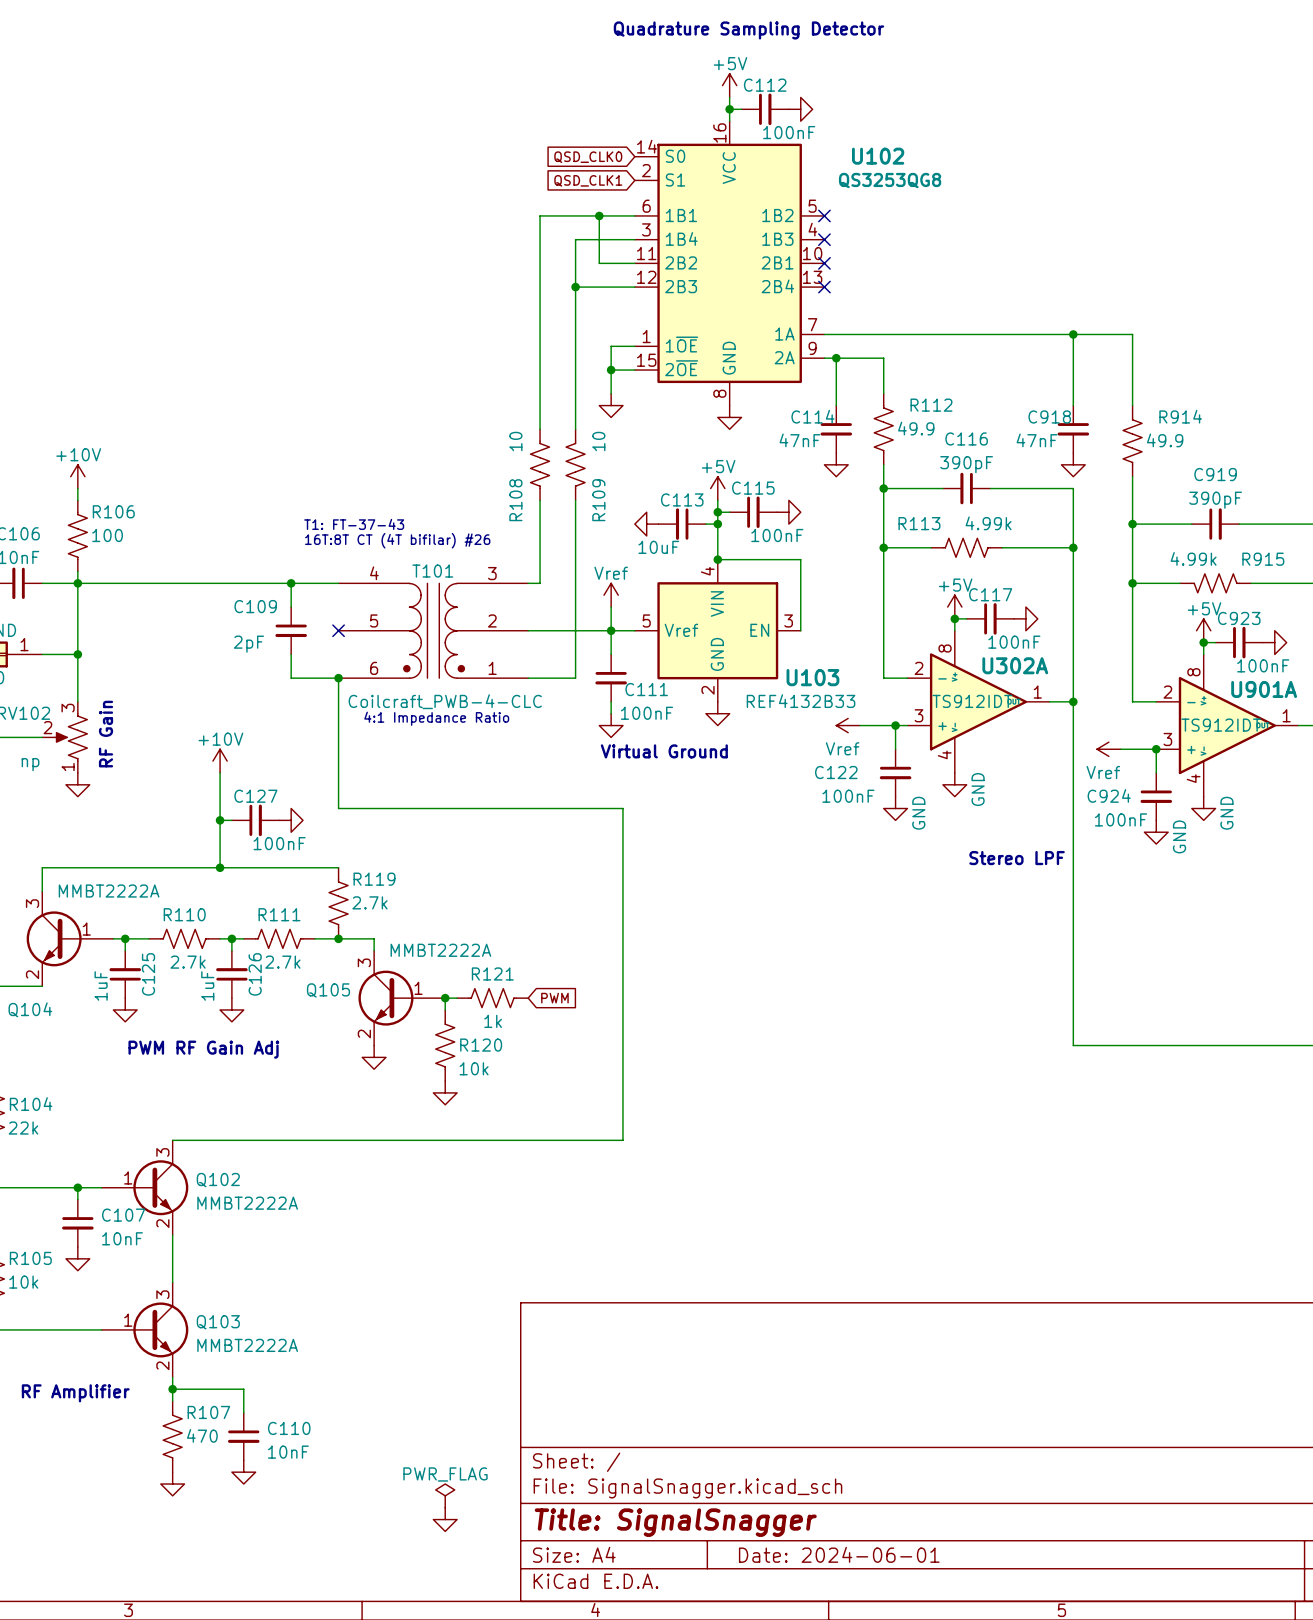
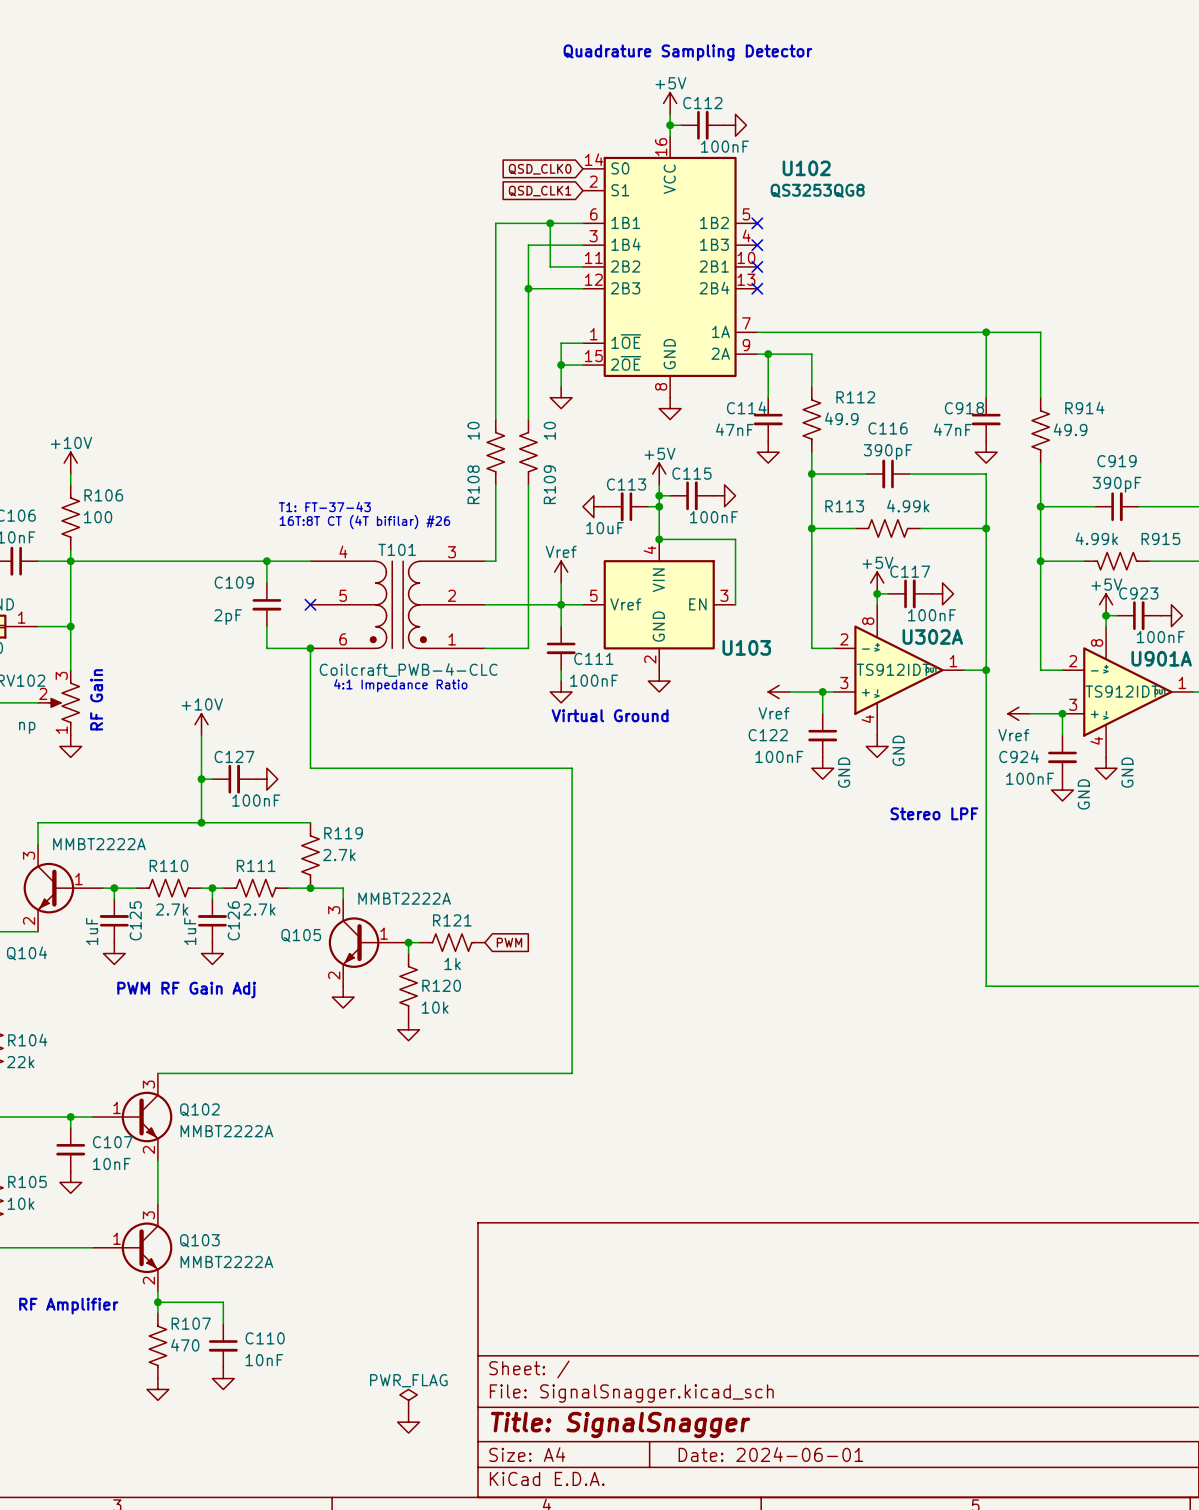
U103 value: REF4132B33 (801, 701) -> none

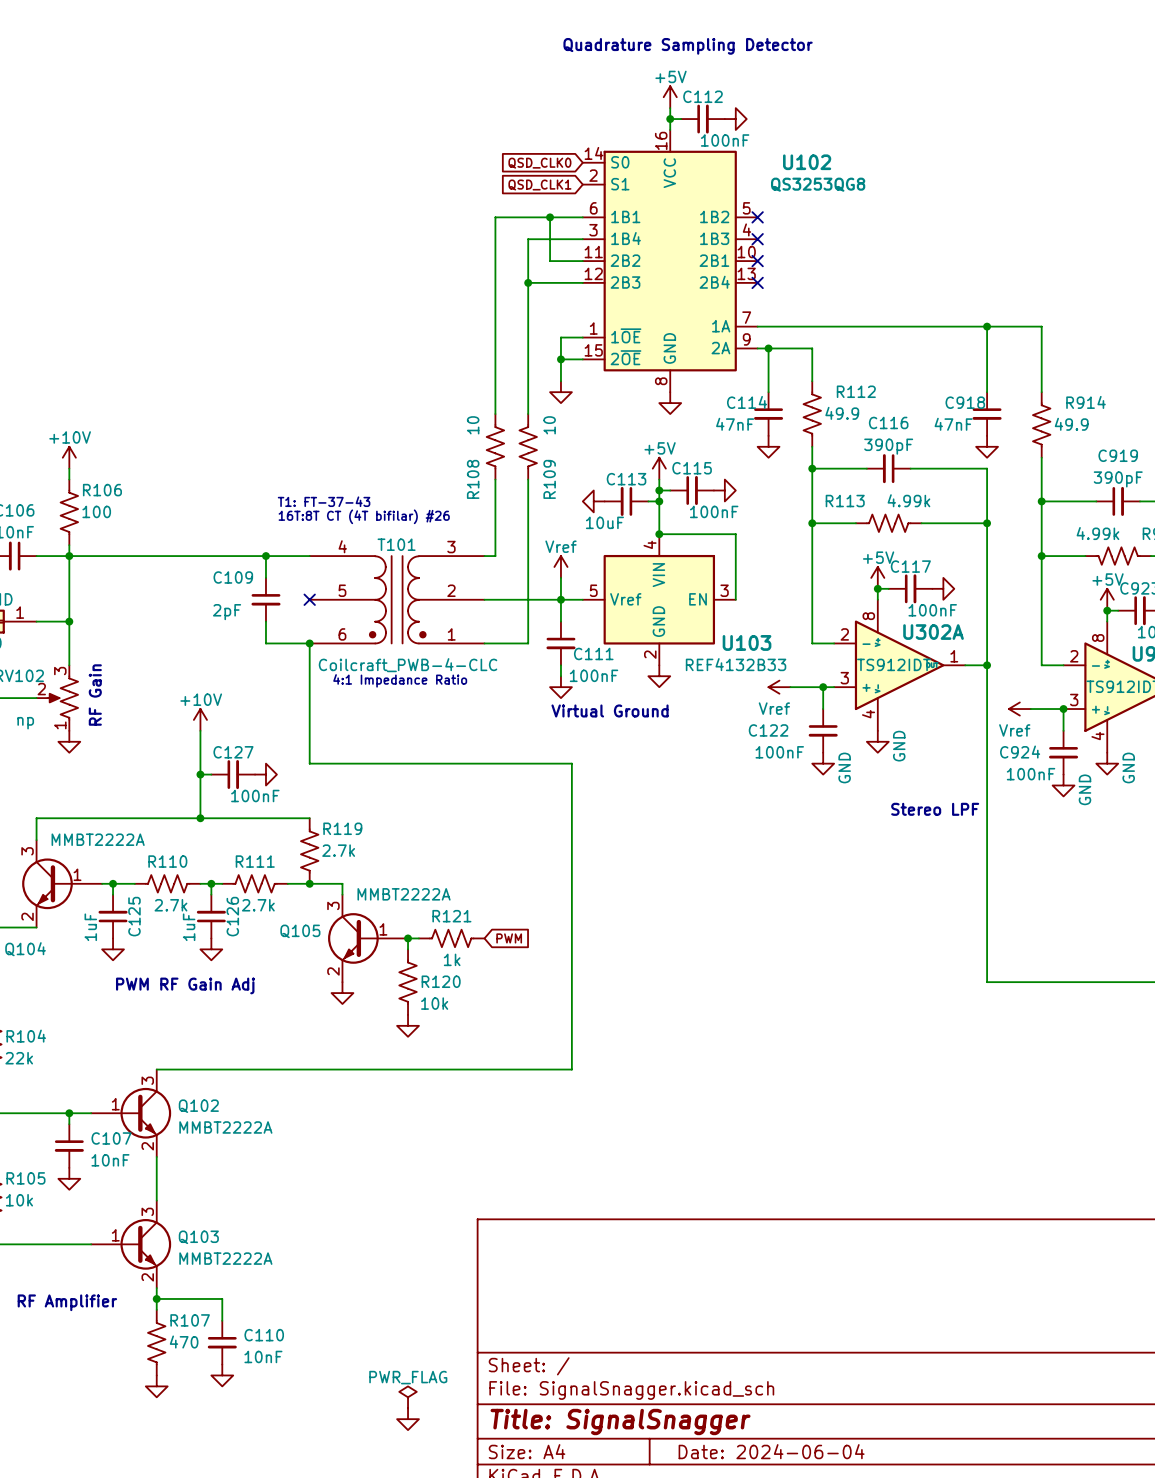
U103 value: none -> REF4132B33 (736, 664)
title block: Date: 2024-06-01 (770, 1454) -> Date: 2024-06-04 (771, 1451)

